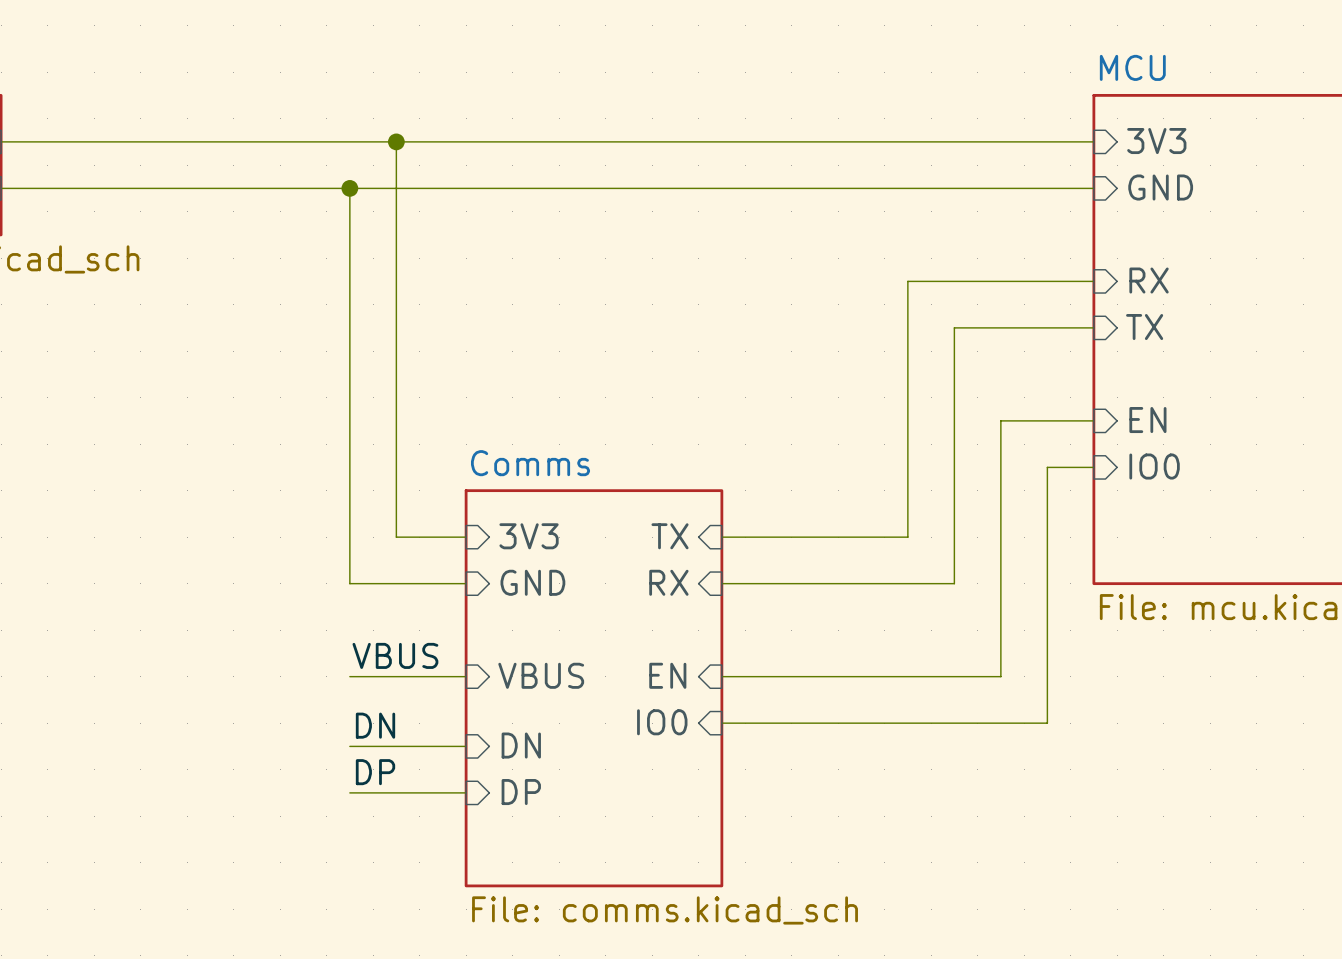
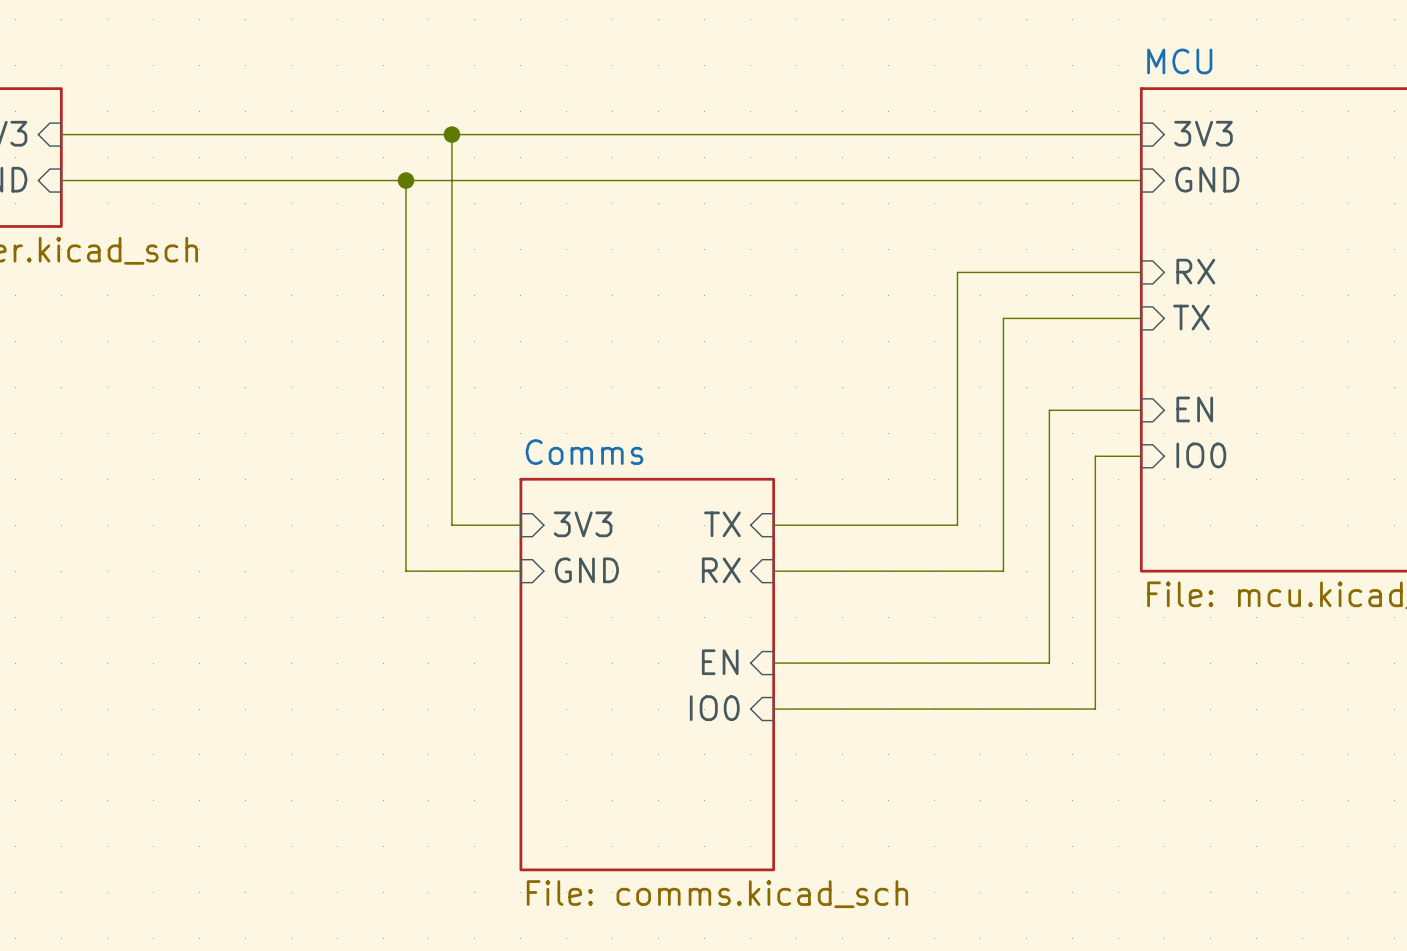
label: VBUS (395, 655) -> none
sheet pin: VBUS (541, 675) -> none
wire: (349, 676) (466, 676) -> none
label: DN (375, 725) -> none
sheet pin: DN (521, 745) -> none
wire: (349, 746) (466, 746) -> none
label: DP (375, 772) -> none
wire: (349, 792) (466, 792) -> none
sheet pin: DP (521, 792) -> none

